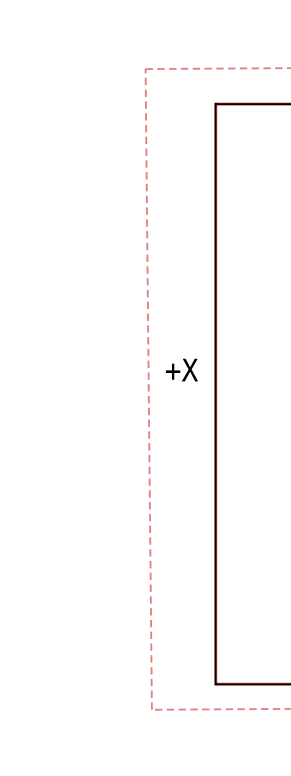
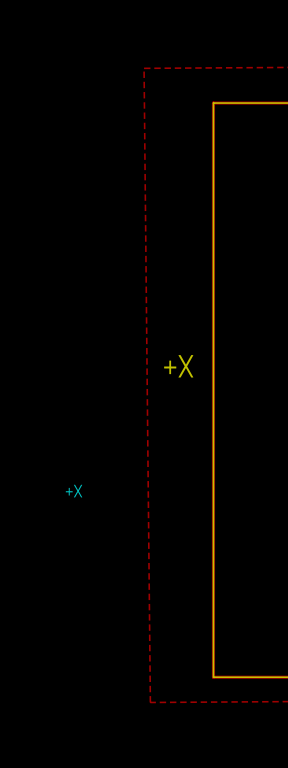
text: none -> +X (74, 491)

